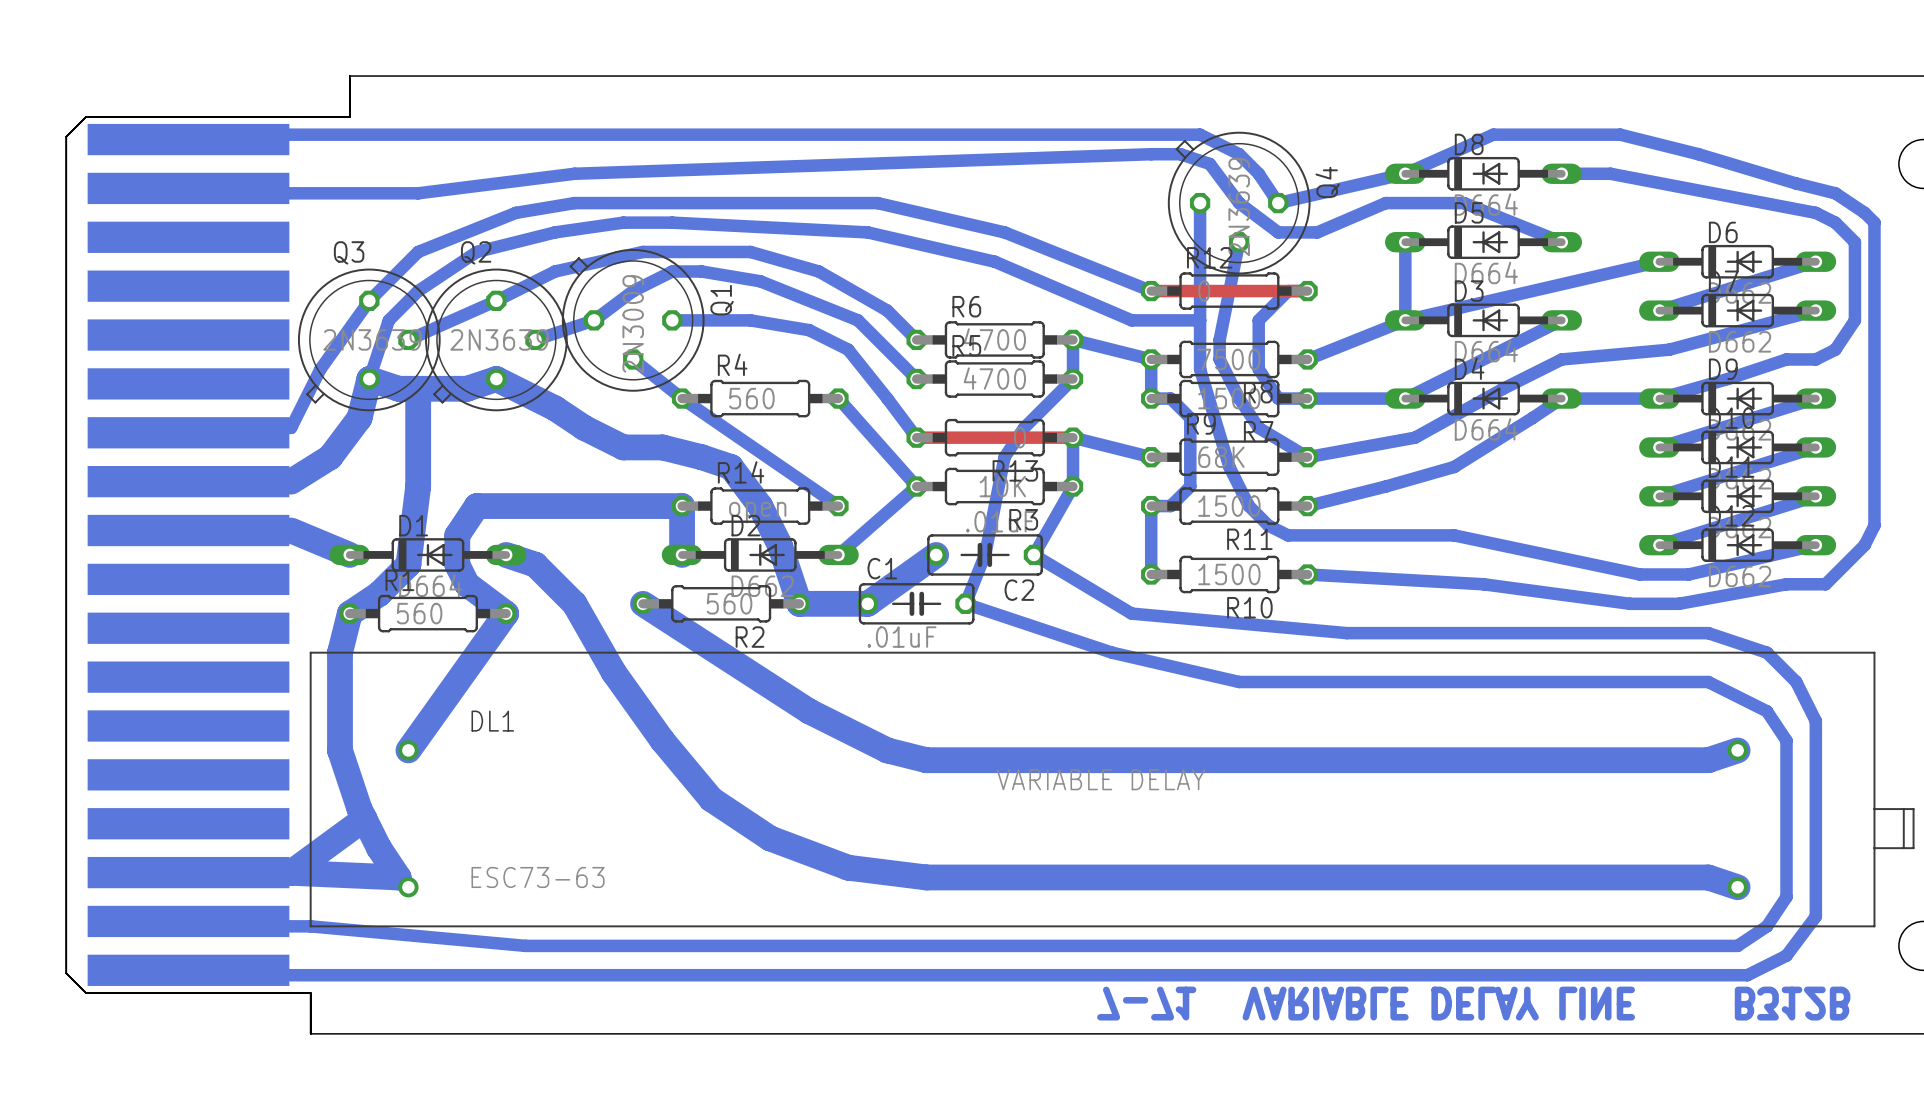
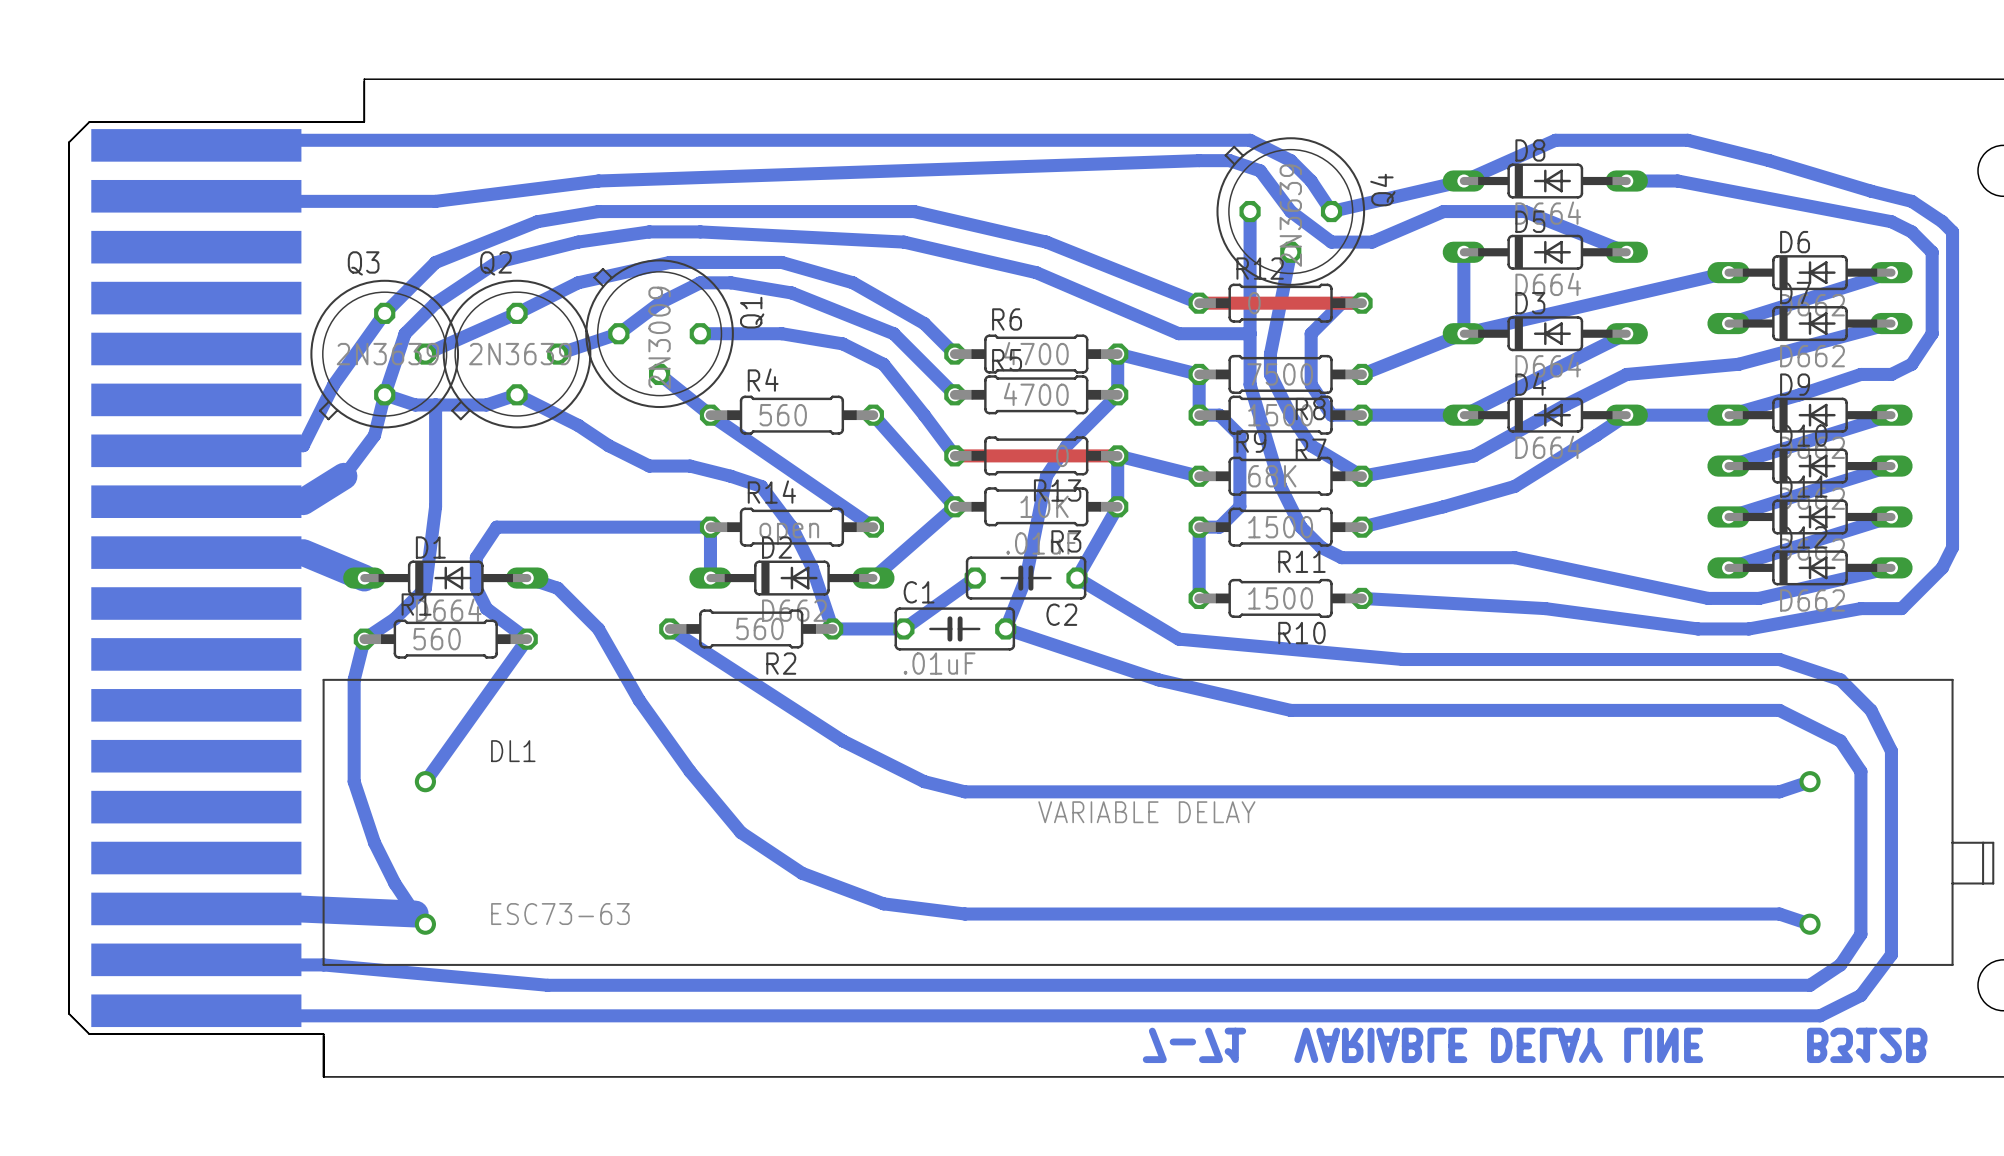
bottom track width: thick (418, 388) (418, 486) (408, 564) (379, 594) (349, 613) (339, 652) (339, 750) (359, 809) (379, 848) (398, 877) -> thin (435, 404) (435, 506) (425, 588) (394, 618) (364, 639) (354, 679) (354, 781) (374, 842) (394, 883) (415, 914)
bottom track width: thick (330, 457) (359, 418) (369, 379) (398, 388) (467, 388) (496, 379) (555, 408) (584, 427) (623, 447) (662, 447) (730, 466) (760, 506) (779, 545) (799, 603) (867, 603) (936, 554) -> thin (343, 476) (374, 435) (384, 394) (415, 404) (486, 404) (517, 394) (578, 425) (608, 445) (649, 466) (690, 466) (761, 486) (791, 527) (812, 567) (832, 628) (903, 628) (975, 578)
bottom track width: thick (506, 554) (535, 564) (574, 603) (613, 672) (662, 740) (711, 799) (770, 838) (848, 867) (926, 877) (1708, 877) (1737, 887) -> thin (527, 578) (557, 588) (598, 628) (639, 700) (690, 771) (741, 832) (802, 873) (883, 903) (965, 914) (1779, 914) (1810, 924)
bottom track width: thick (682, 554) (682, 506) (476, 506) (457, 535) (457, 564) (467, 584) (506, 613) (408, 750) -> thin (710, 578) (710, 527) (496, 527) (476, 557) (476, 588) (486, 608) (527, 639) (425, 781)
bottom track width: thick (642, 603) (809, 711) (887, 750) (926, 760) (1708, 760) (1737, 750) -> thin (669, 628) (842, 740) (924, 781) (965, 791) (1779, 791) (1810, 781)
bottom track: (364, 818) (291, 872) (281, 872) -> none

